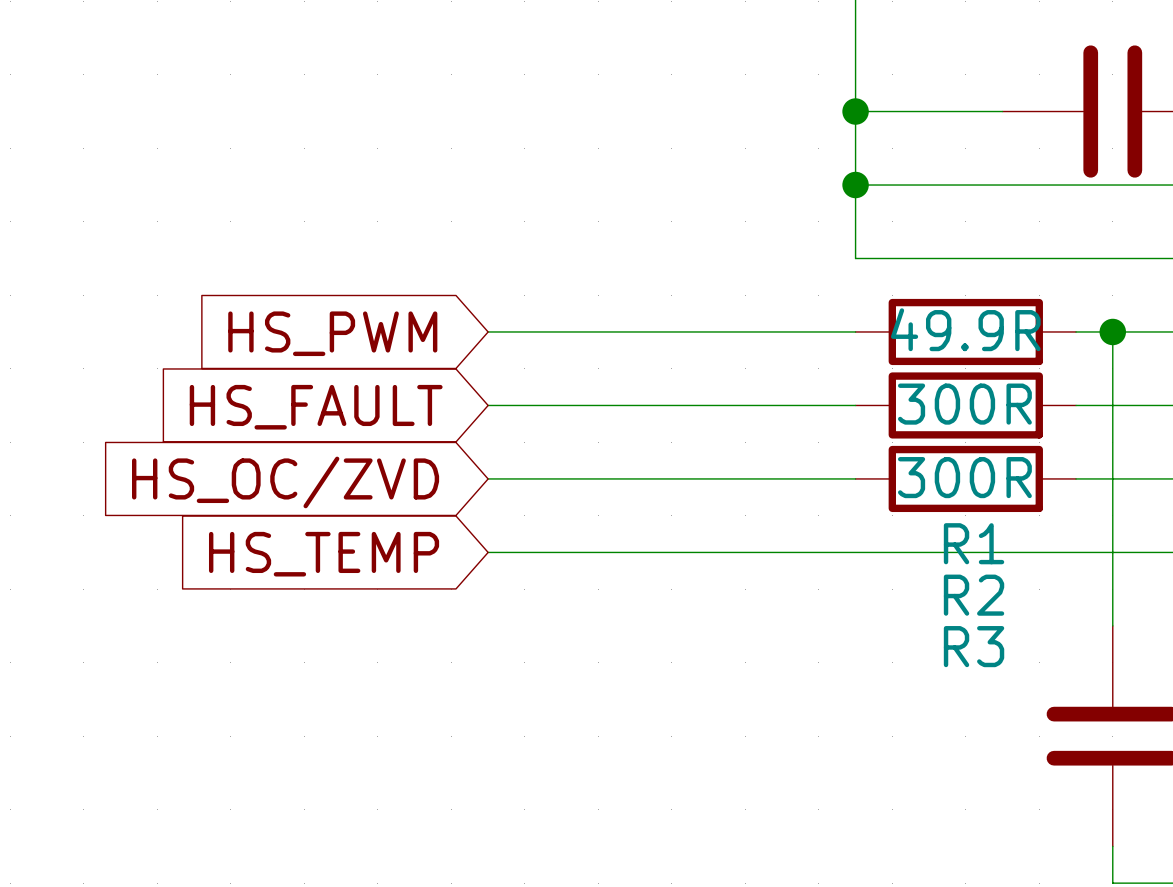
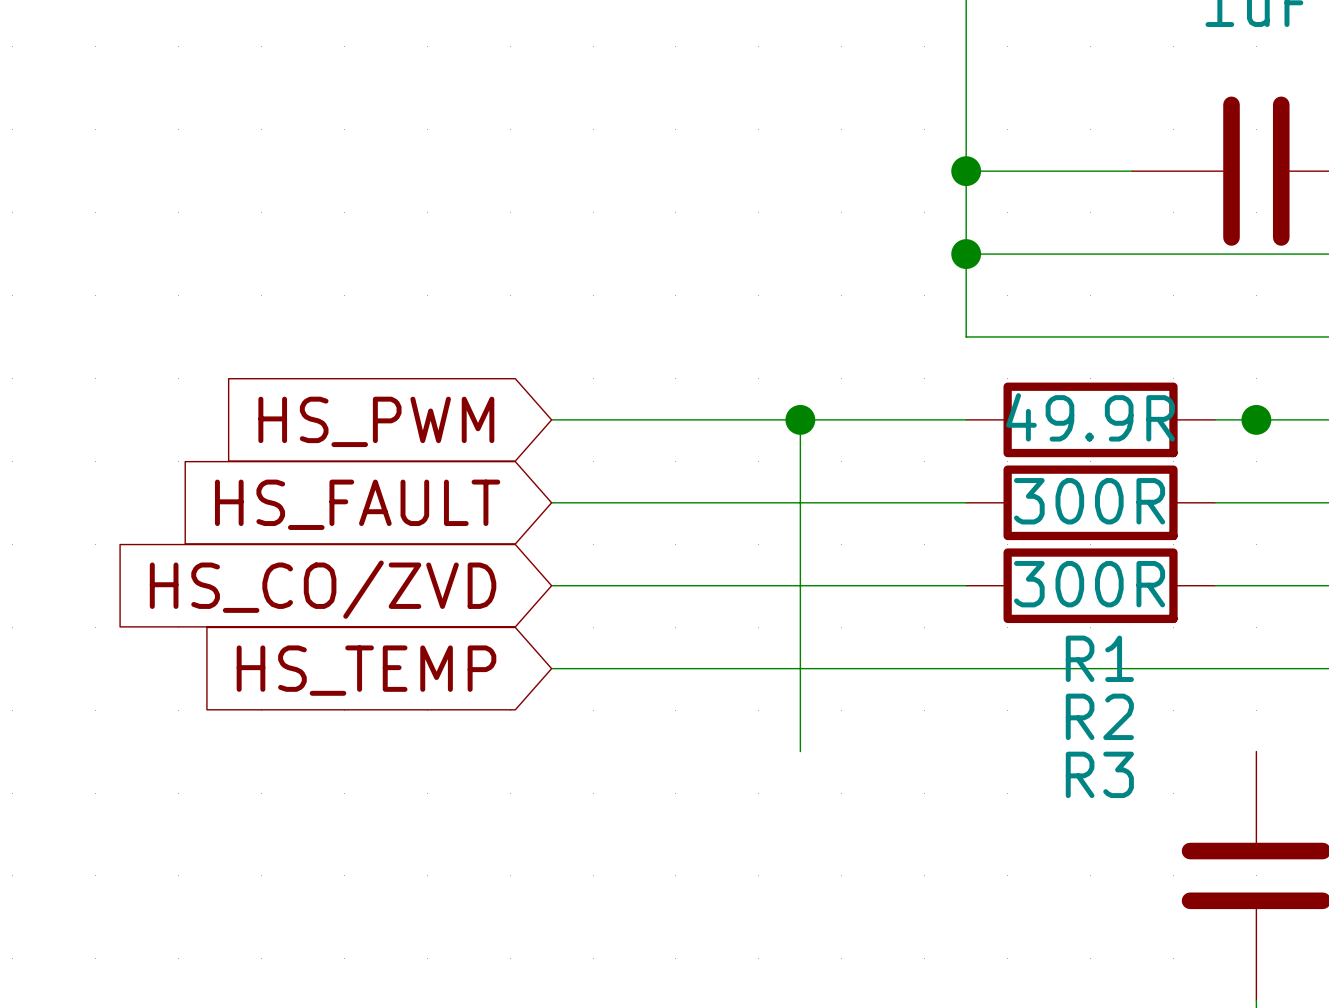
junction: none -> (800, 419)
wire: (1112, 331) (1112, 625) -> (800, 419) (800, 751)
global label: HS_OC/ZVD (285, 482) -> HS_CO/ZVD (323, 589)

